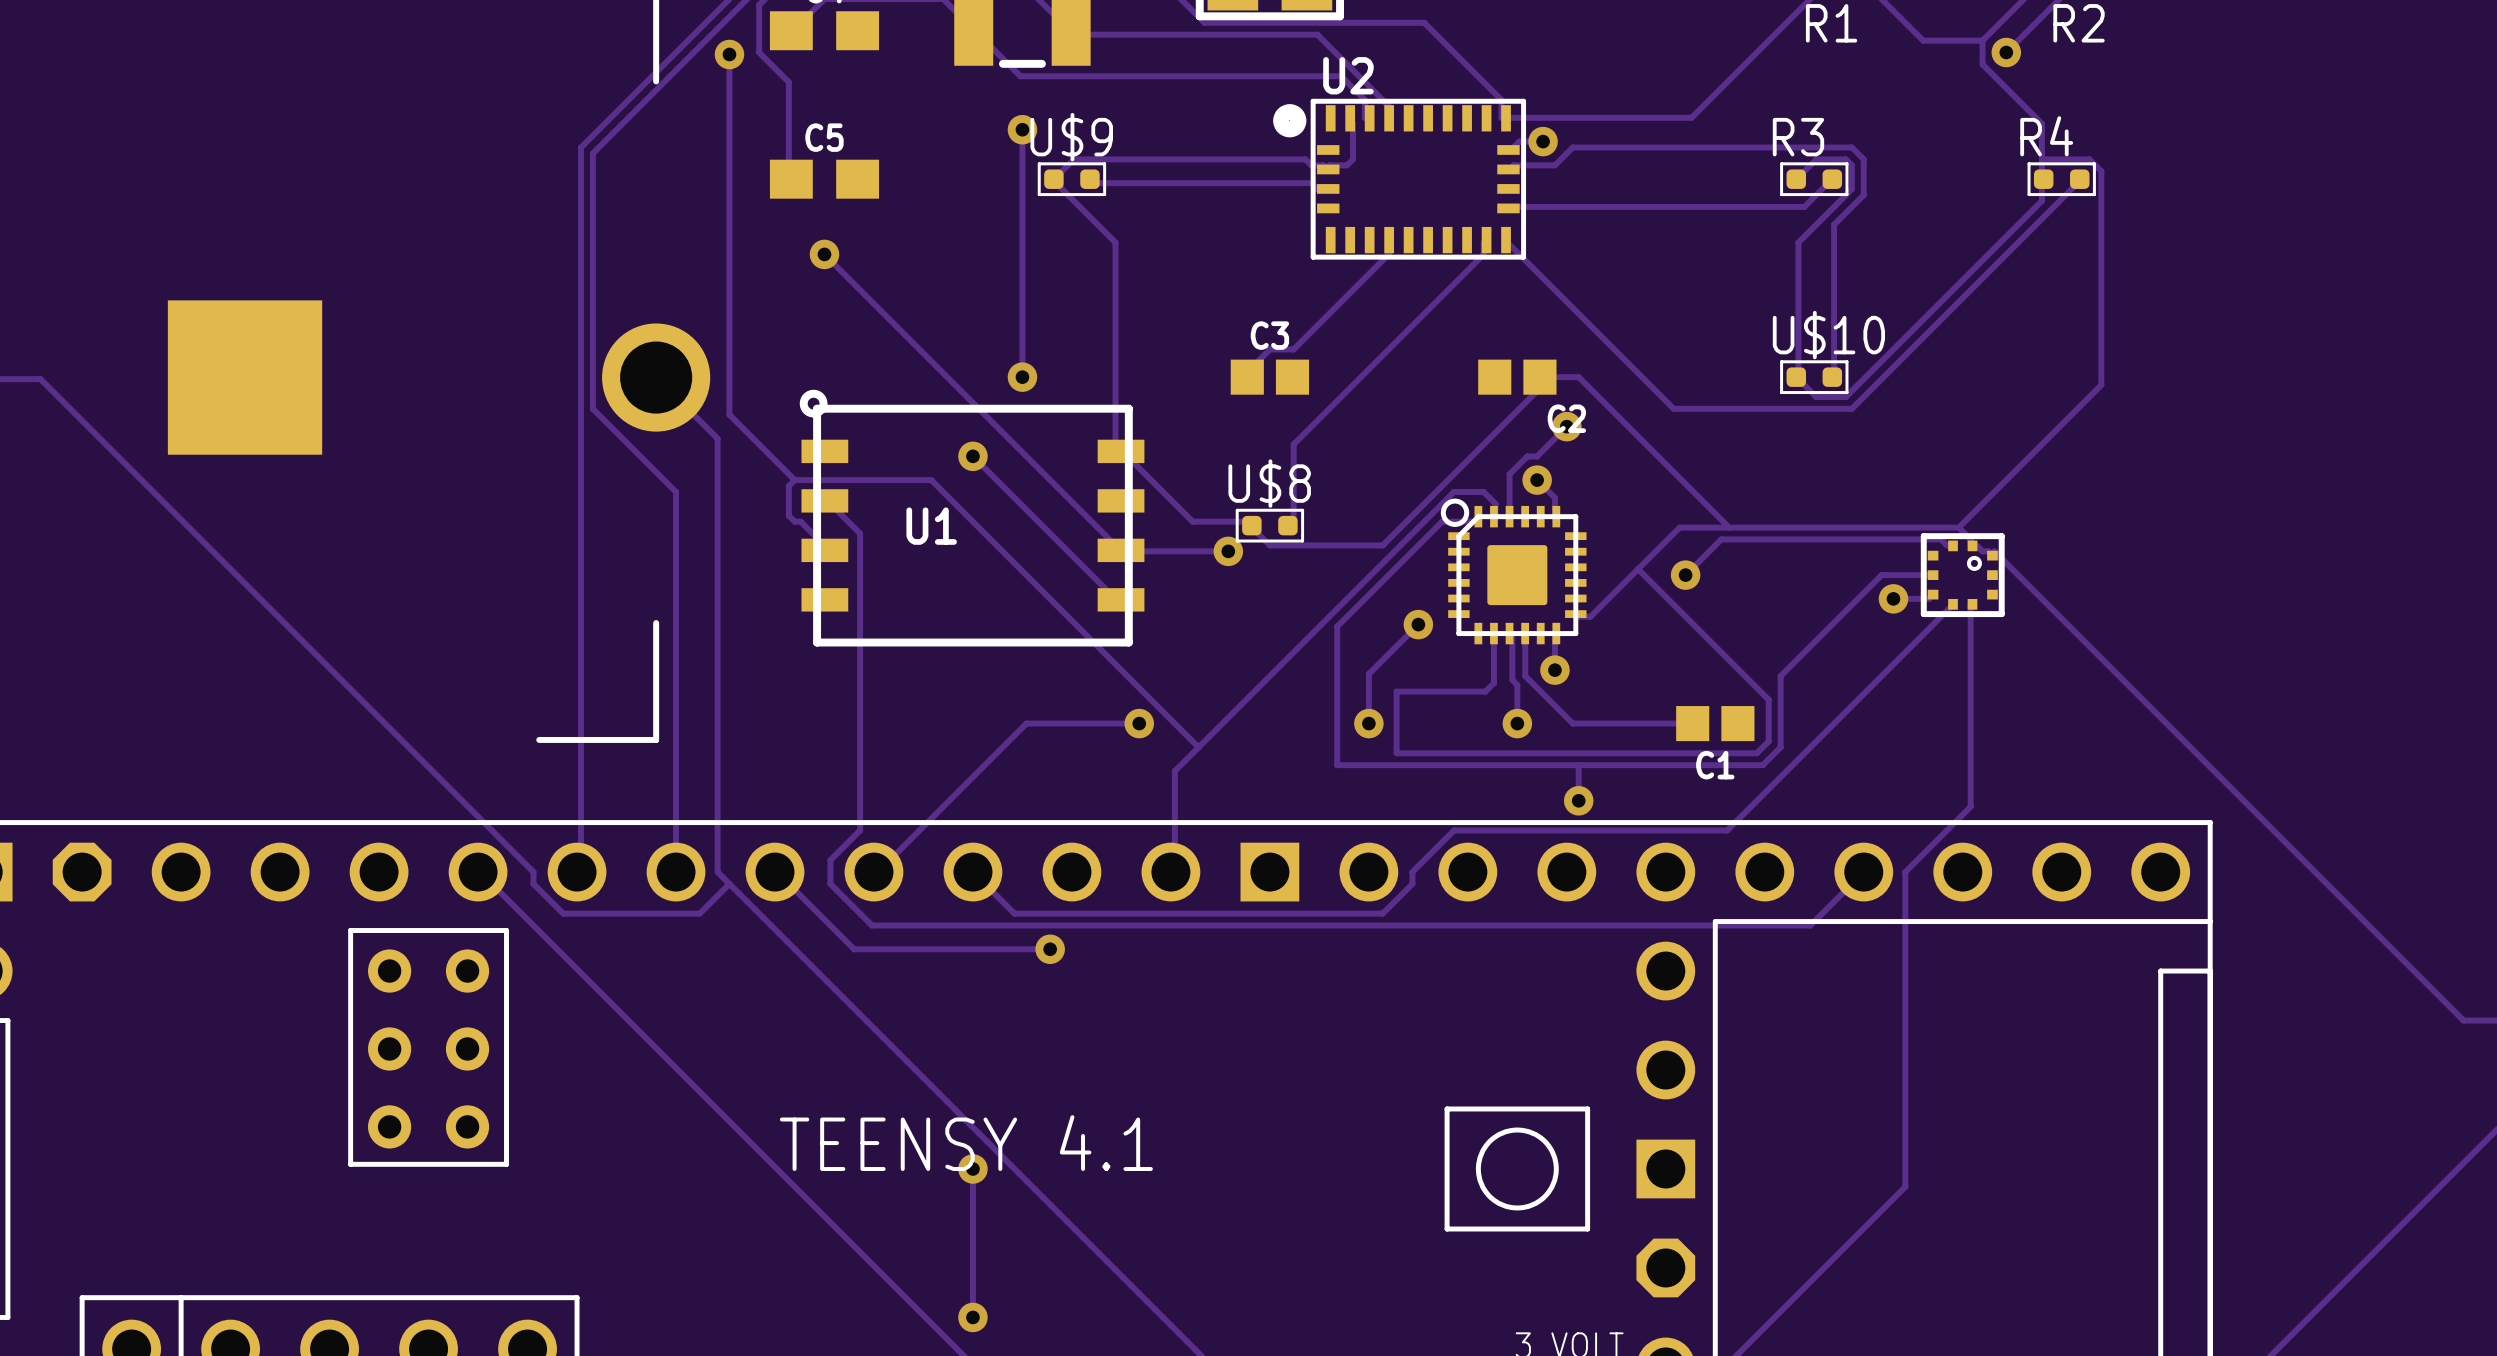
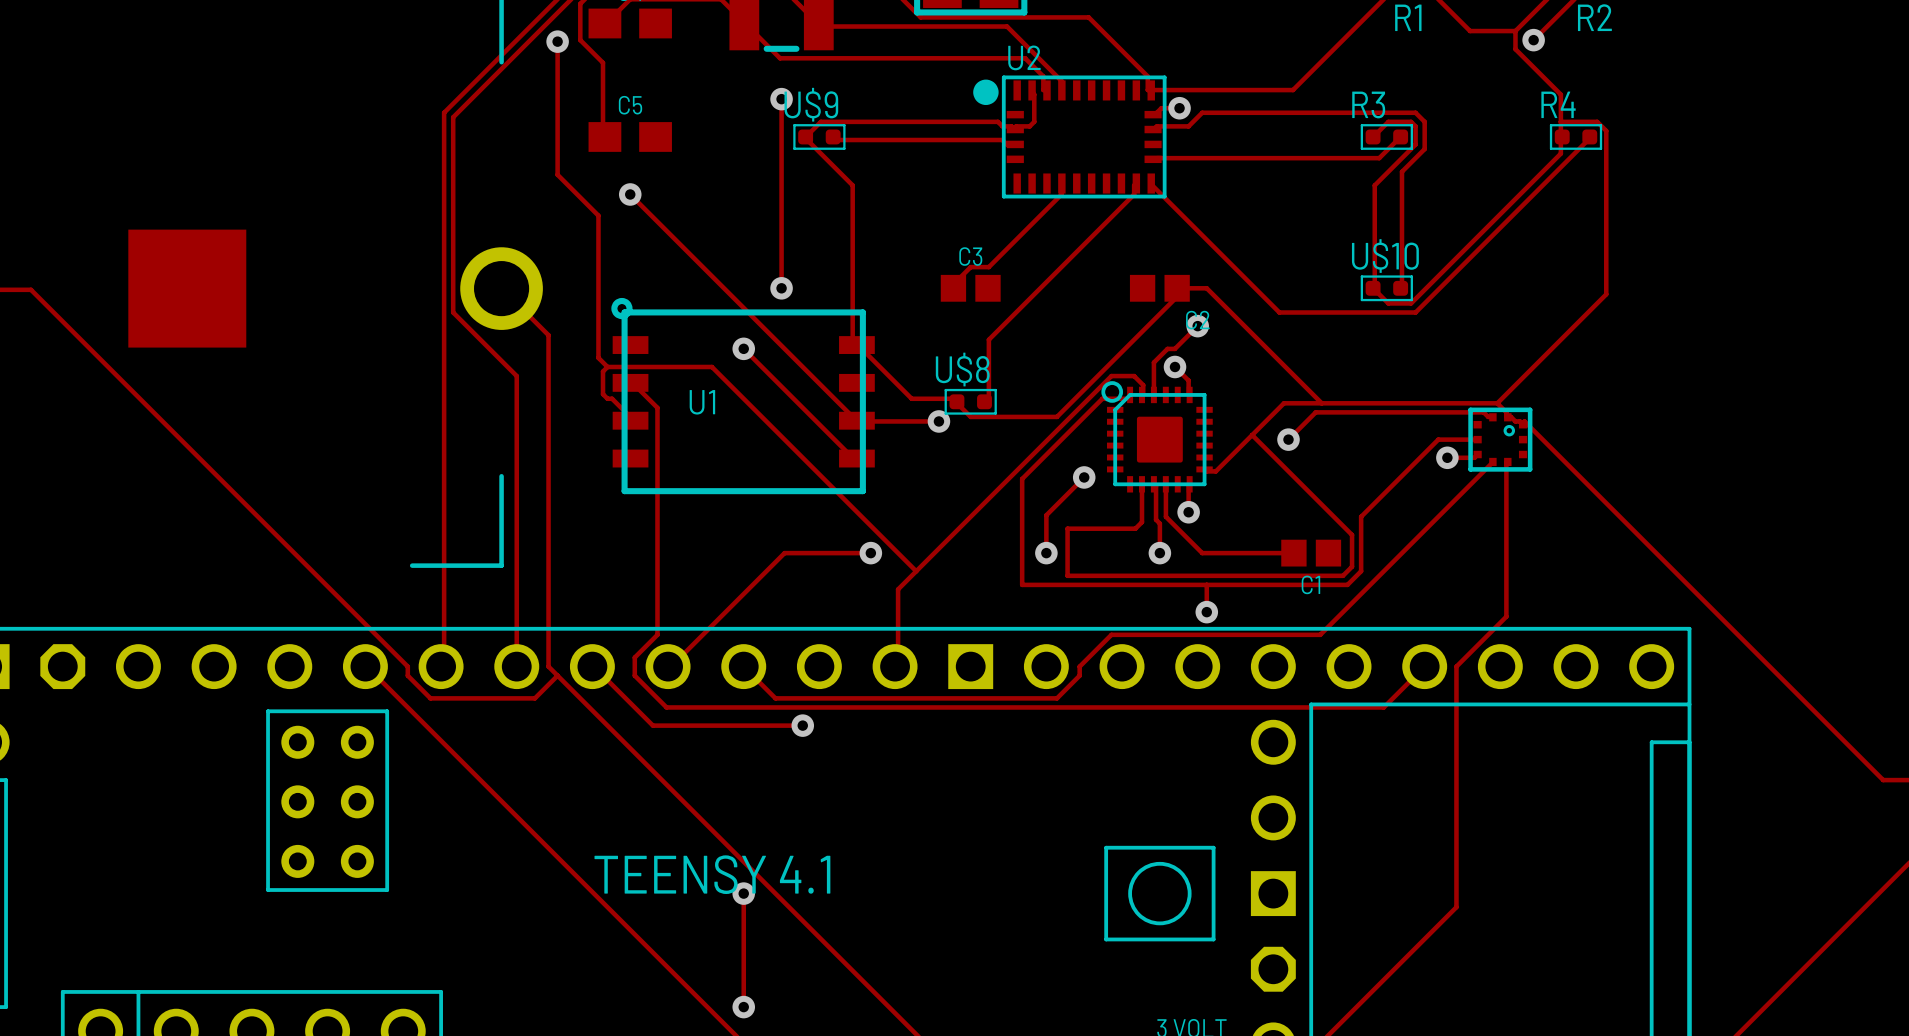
track: (729, 228) (729, 414) (782, 468) -> (557, 174) (598, 215) (598, 357)

